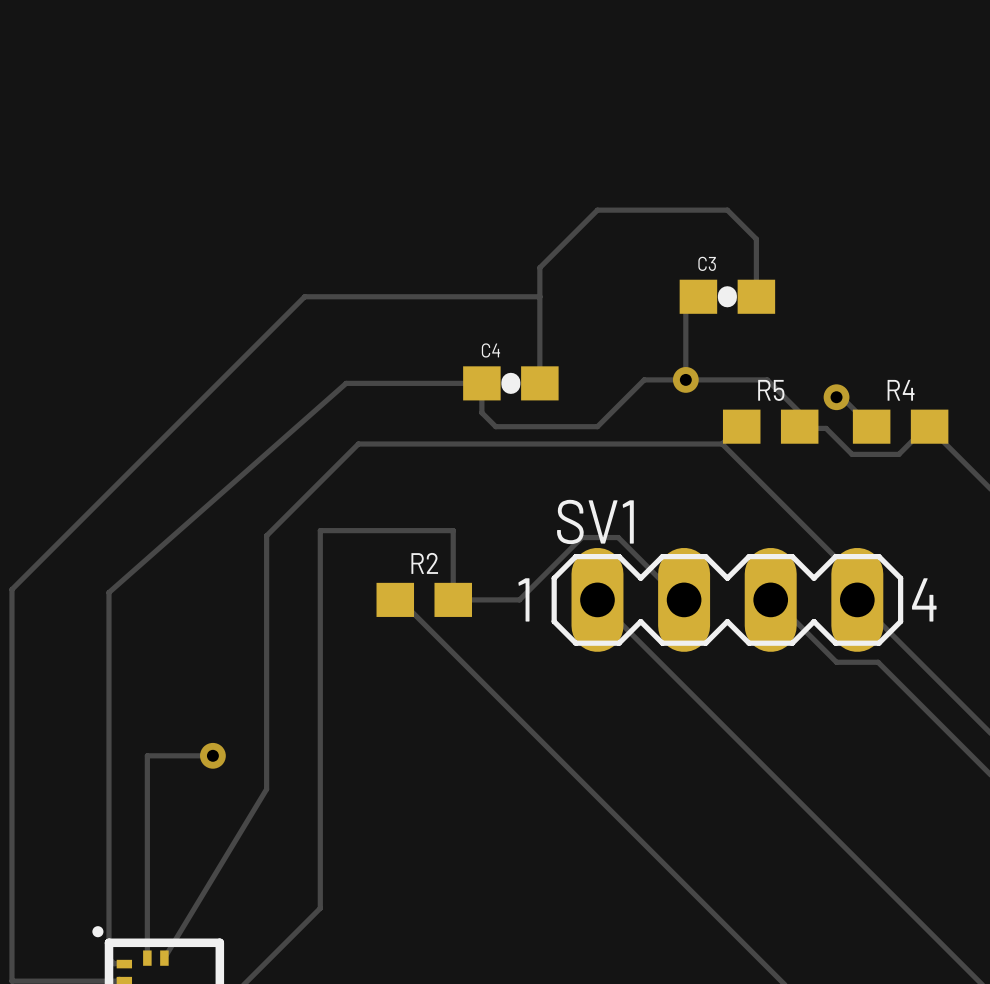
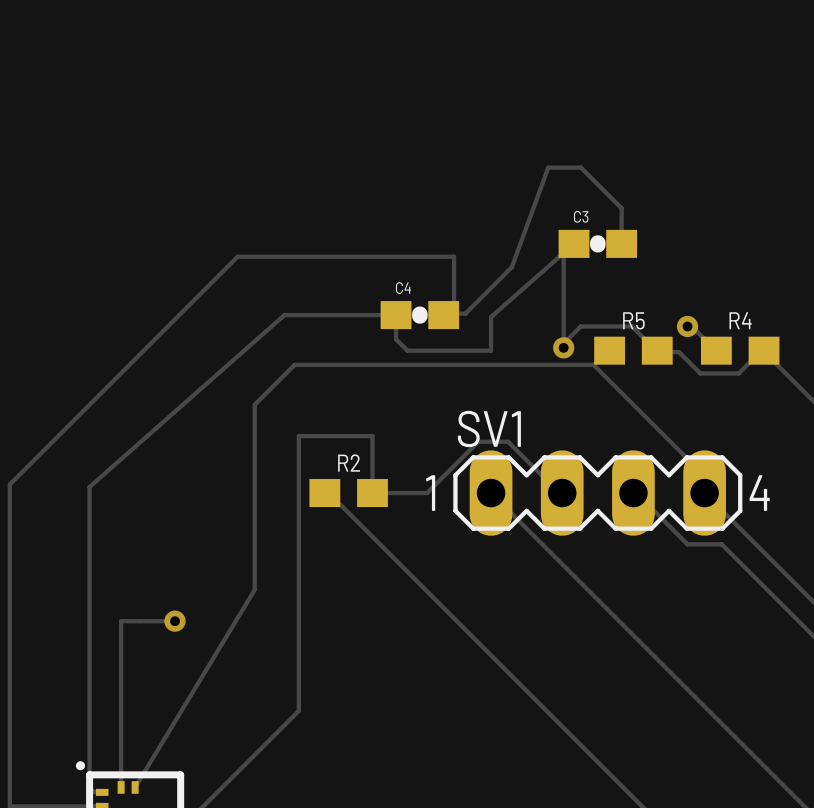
track: (756, 253) (756, 239) (727, 210) (597, 210) (539, 267) (539, 383) -> (621, 208) (580, 167) (548, 167) (511, 267) (465, 313) (444, 313)
track: (539, 296) (304, 296) (289, 312) -> (443, 315) (454, 304) (454, 256) (237, 256)
track: none -> (563, 312) (563, 347)
via position: (685, 379) -> (563, 347)
track: none -> (563, 339) (567, 339) (580, 326) (632, 326) (653, 347)
track: (597, 426) (644, 379) (767, 379) (799, 412) (799, 426) -> (491, 350) (491, 317) (567, 249)
track: (309, 492) (266, 535) (266, 789) -> (254, 404) (254, 589) (219, 648)
track: (363, 530) (320, 530) (320, 908) -> (298, 436) (298, 710) (263, 746)

